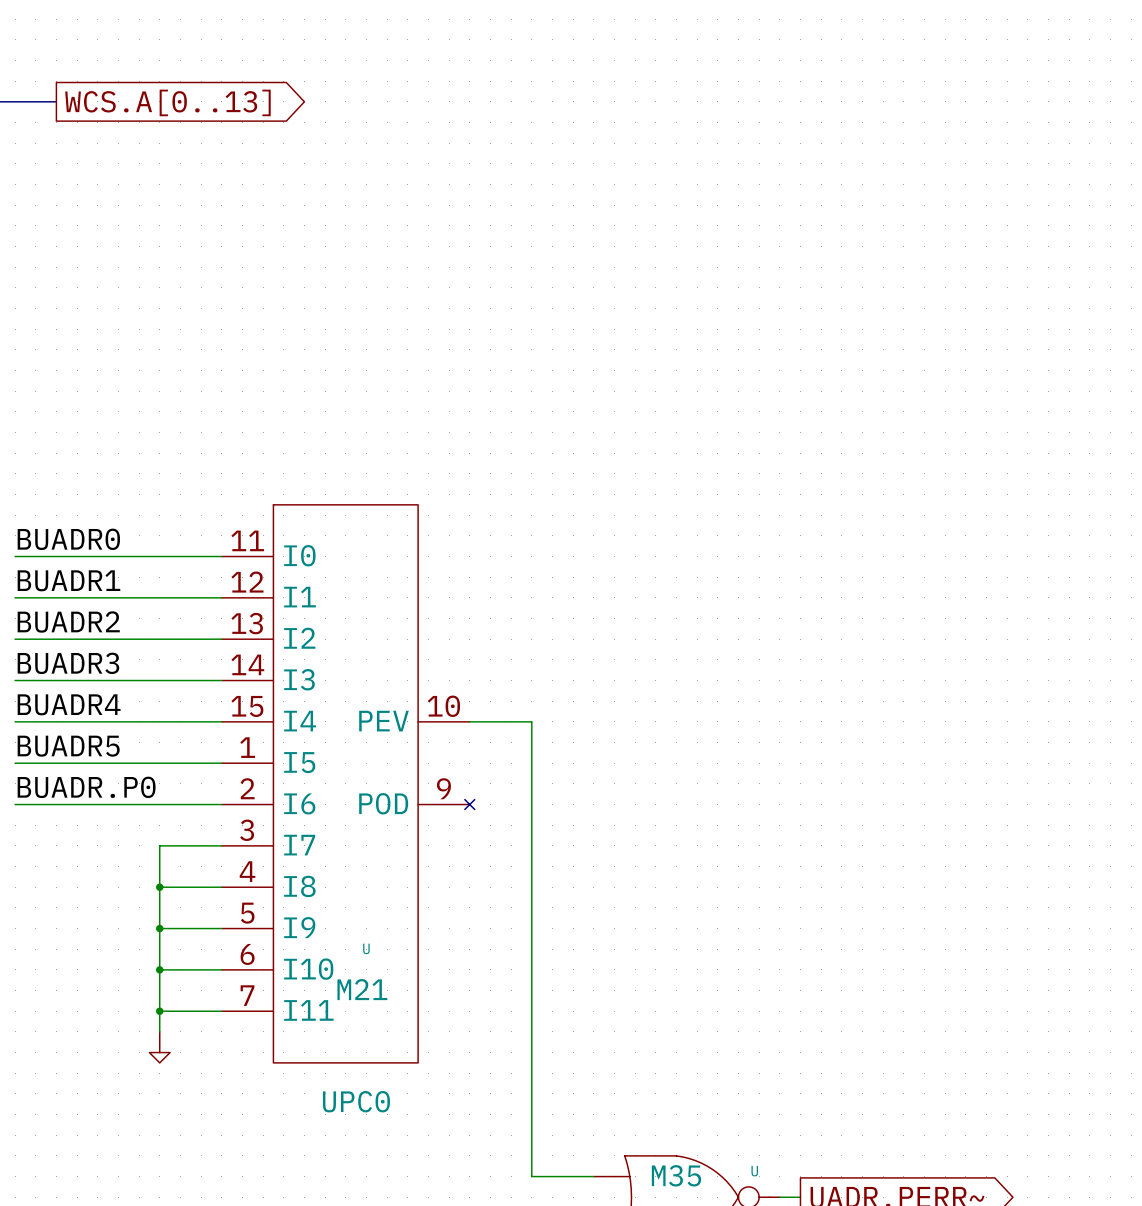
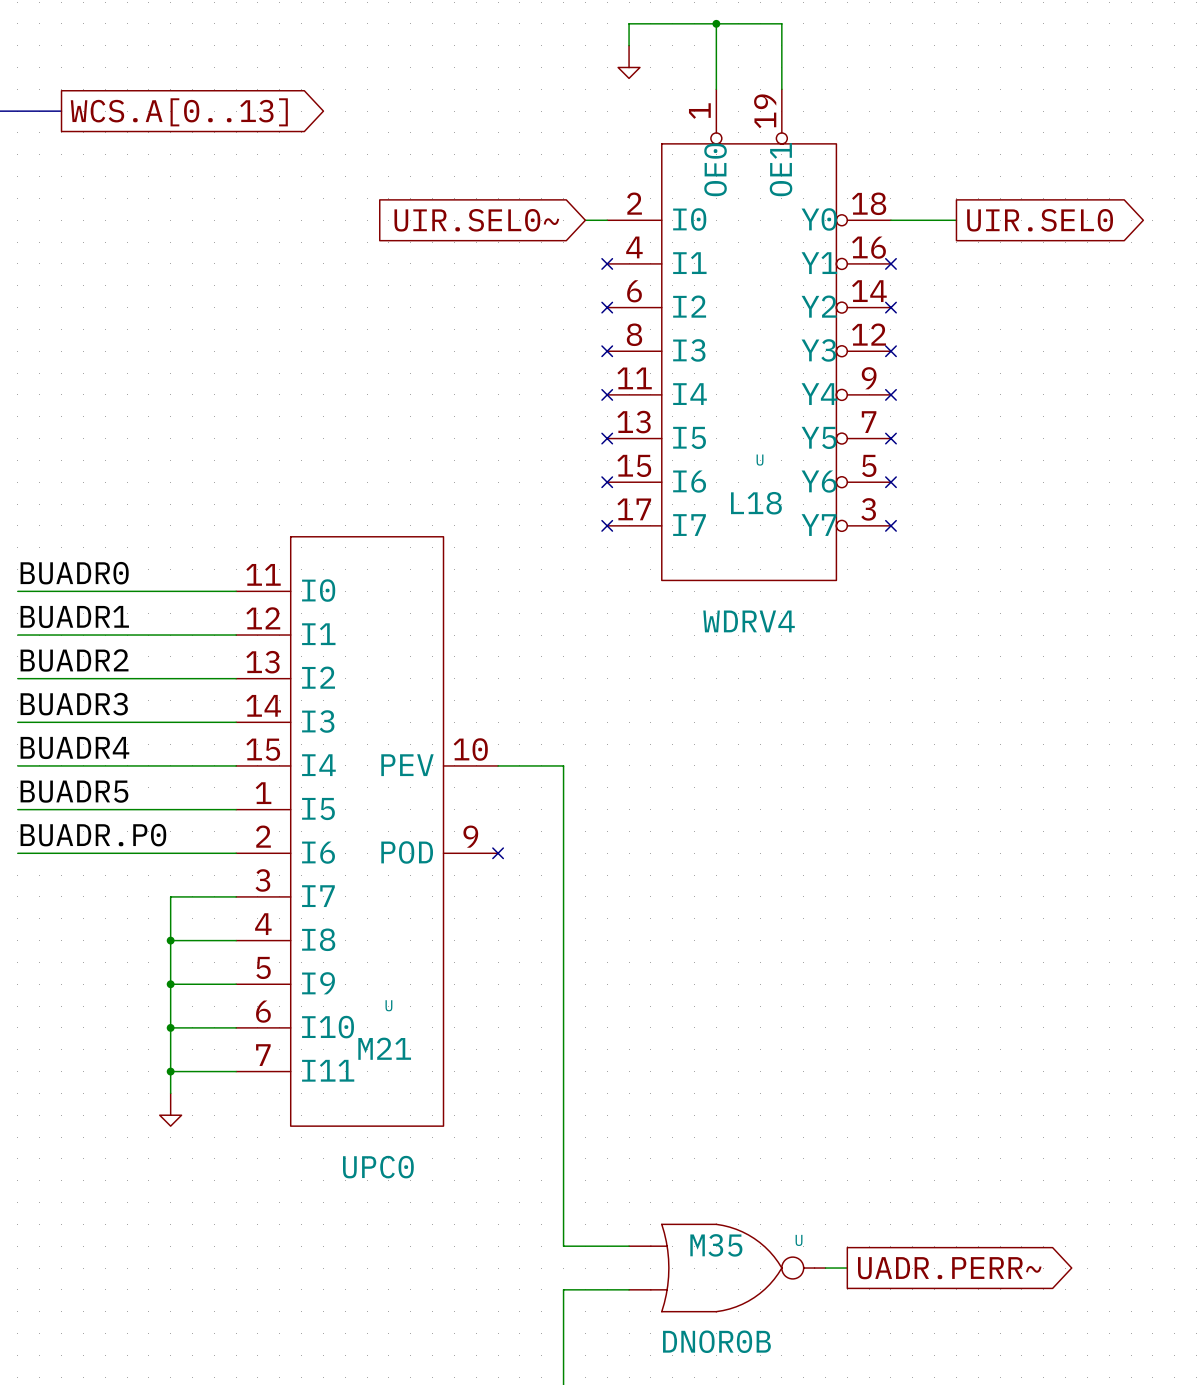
wire: none -> (716, 23) (716, 89)
junction: none -> (716, 23)
wire: none -> (629, 45) (629, 23) (781, 23) (781, 89)
power symbol: none -> (629, 62)
global label: none -> UIR.SEL0~ (476, 220)
wire: none -> (585, 220) (607, 220)
wire: none -> (890, 220) (956, 220)
global label: none -> UIR.SEL0 (1040, 220)
no-connect mark: none -> (607, 263)
no-connect mark: none -> (890, 263)
no-connect mark: none -> (607, 307)
no-connect mark: none -> (890, 307)
U: none -> (749, 334)
no-connect mark: none -> (607, 351)
no-connect mark: none -> (890, 351)
no-connect mark: none -> (607, 394)
no-connect mark: none -> (890, 394)
no-connect mark: none -> (607, 438)
no-connect mark: none -> (890, 438)
no-connect mark: none -> (607, 482)
no-connect mark: none -> (890, 482)
no-connect mark: none -> (607, 525)
no-connect mark: none -> (890, 525)

